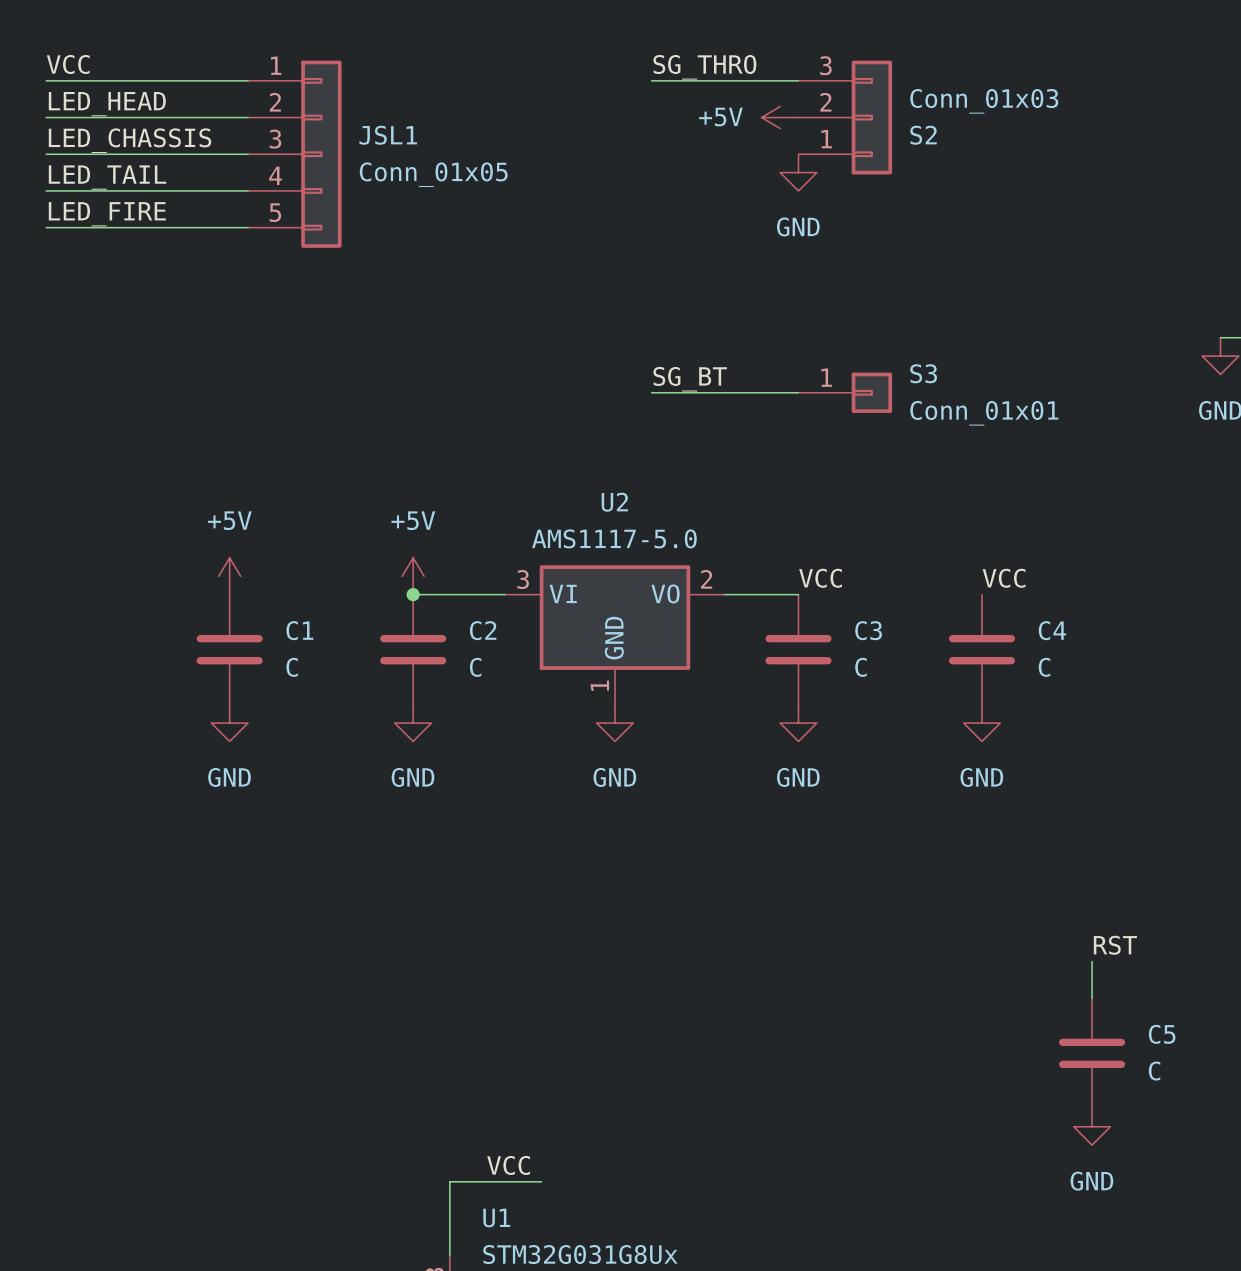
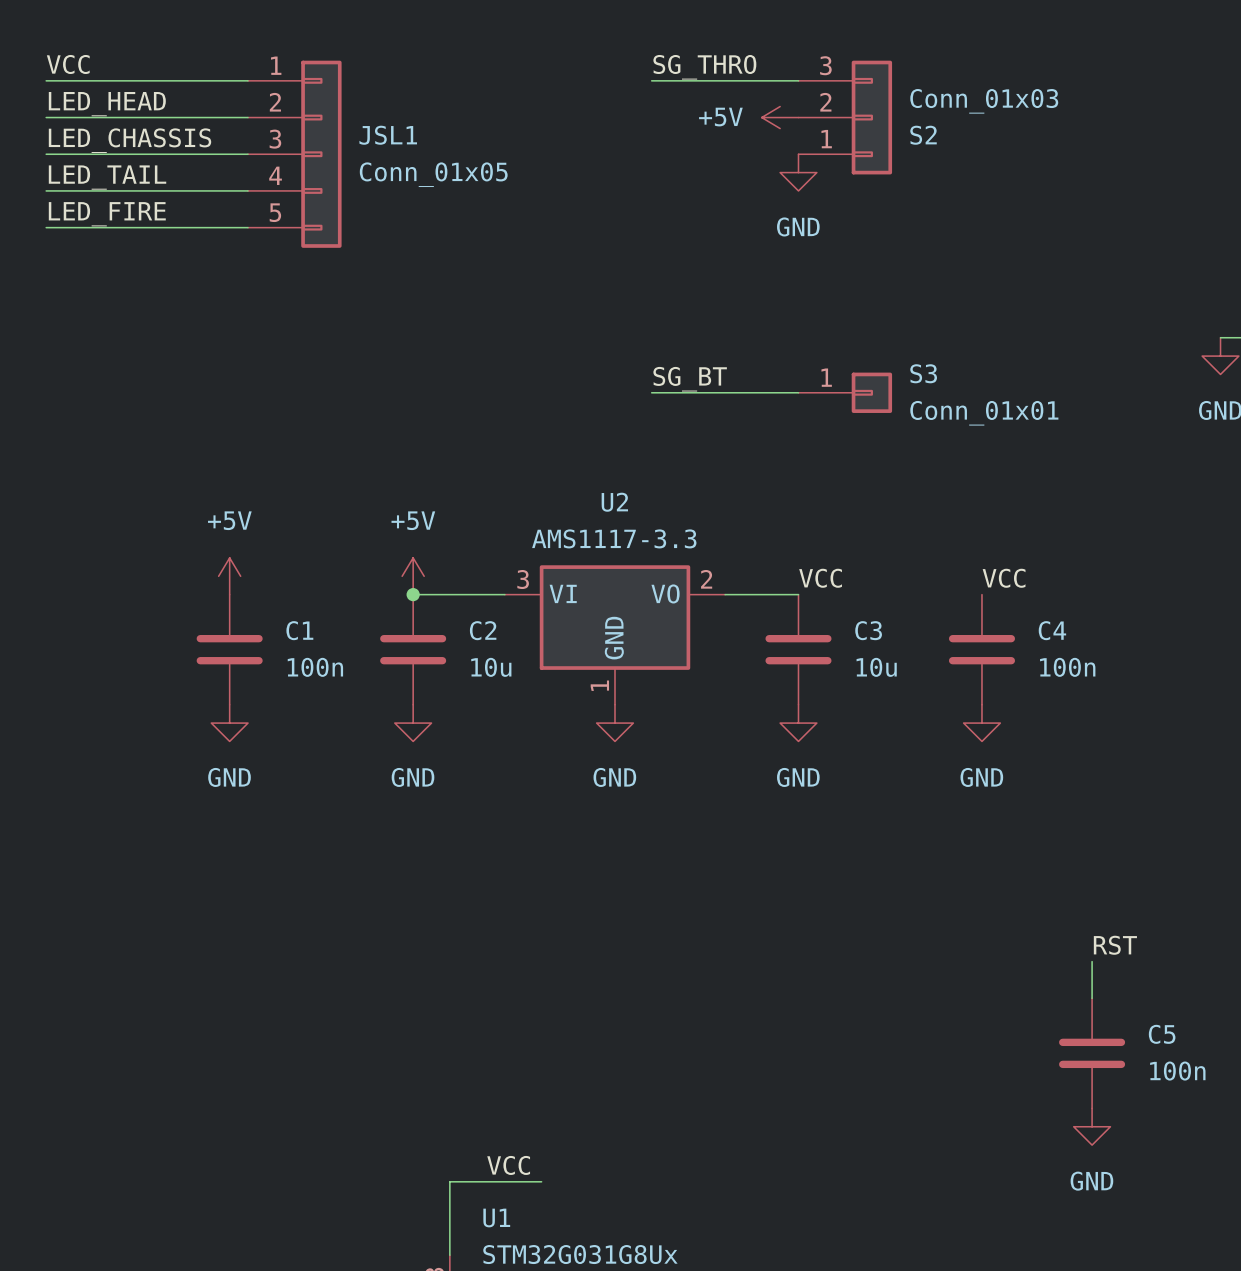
U2 value: AMS1117-5.0 (614, 538) -> AMS1117-3.3 (614, 538)
C1 value: C (292, 667) -> 100n (315, 667)
C2 value: C (475, 667) -> 10u (491, 667)
C3 value: C (860, 667) -> 10u (876, 667)
C4 value: C (1044, 667) -> 100n (1067, 667)
C5 value: C (1154, 1071) -> 100n (1177, 1071)

